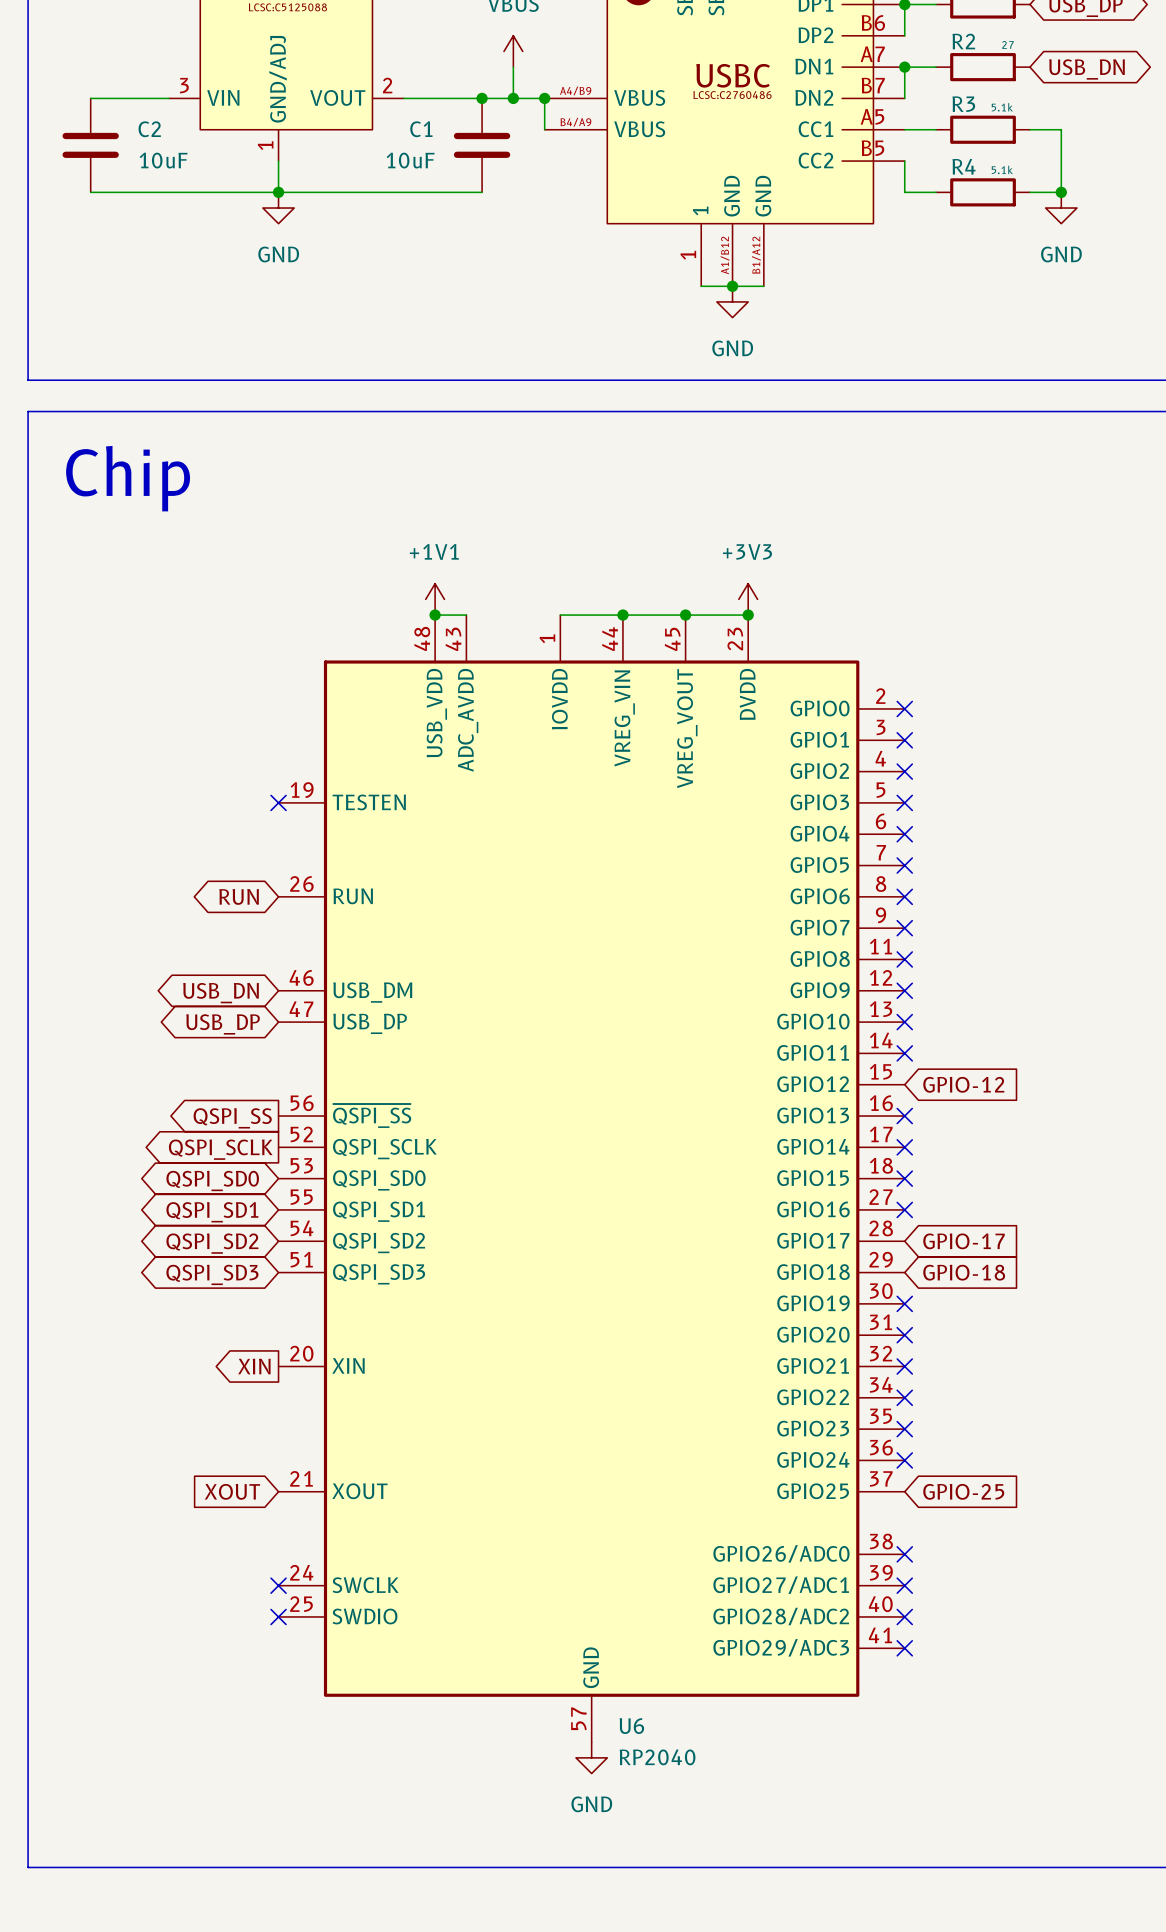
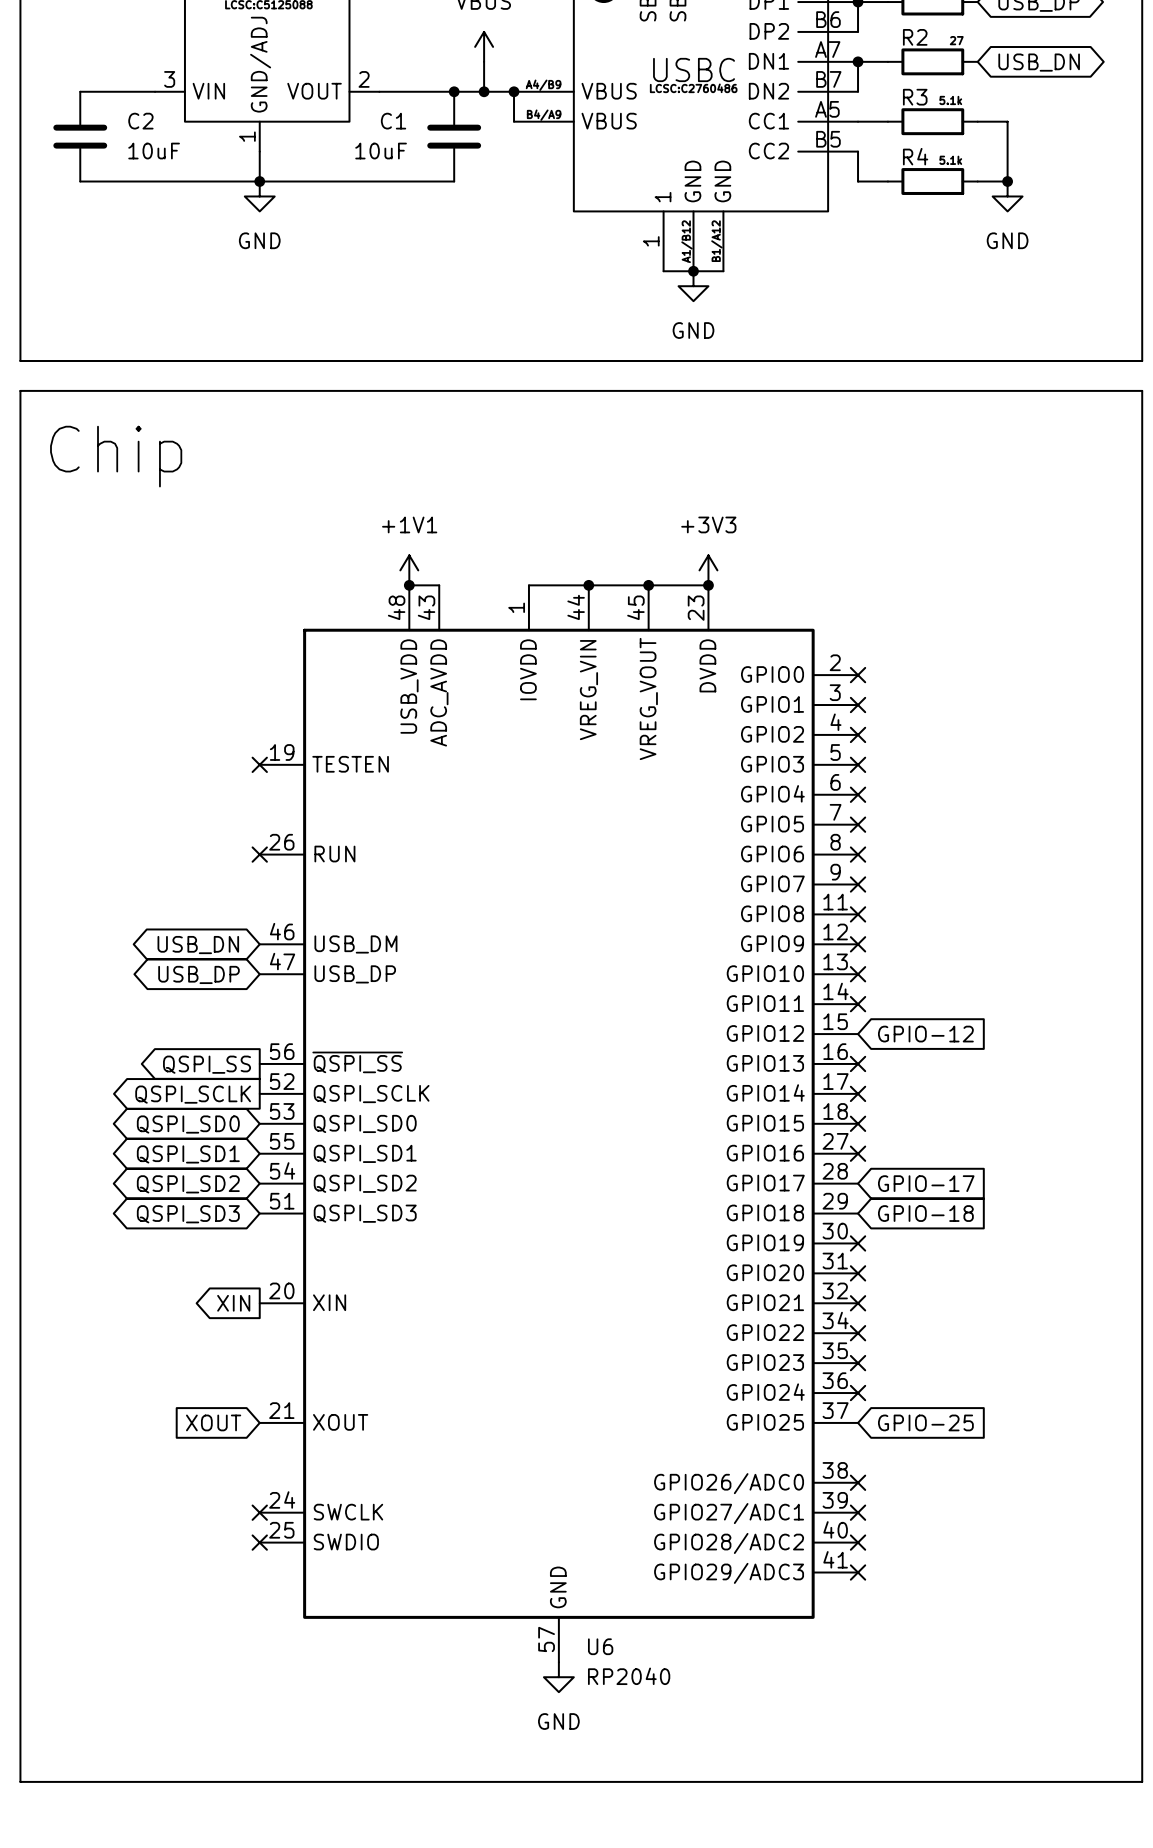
global label: RUN (239, 896) -> none
no-connect mark: none -> (259, 854)

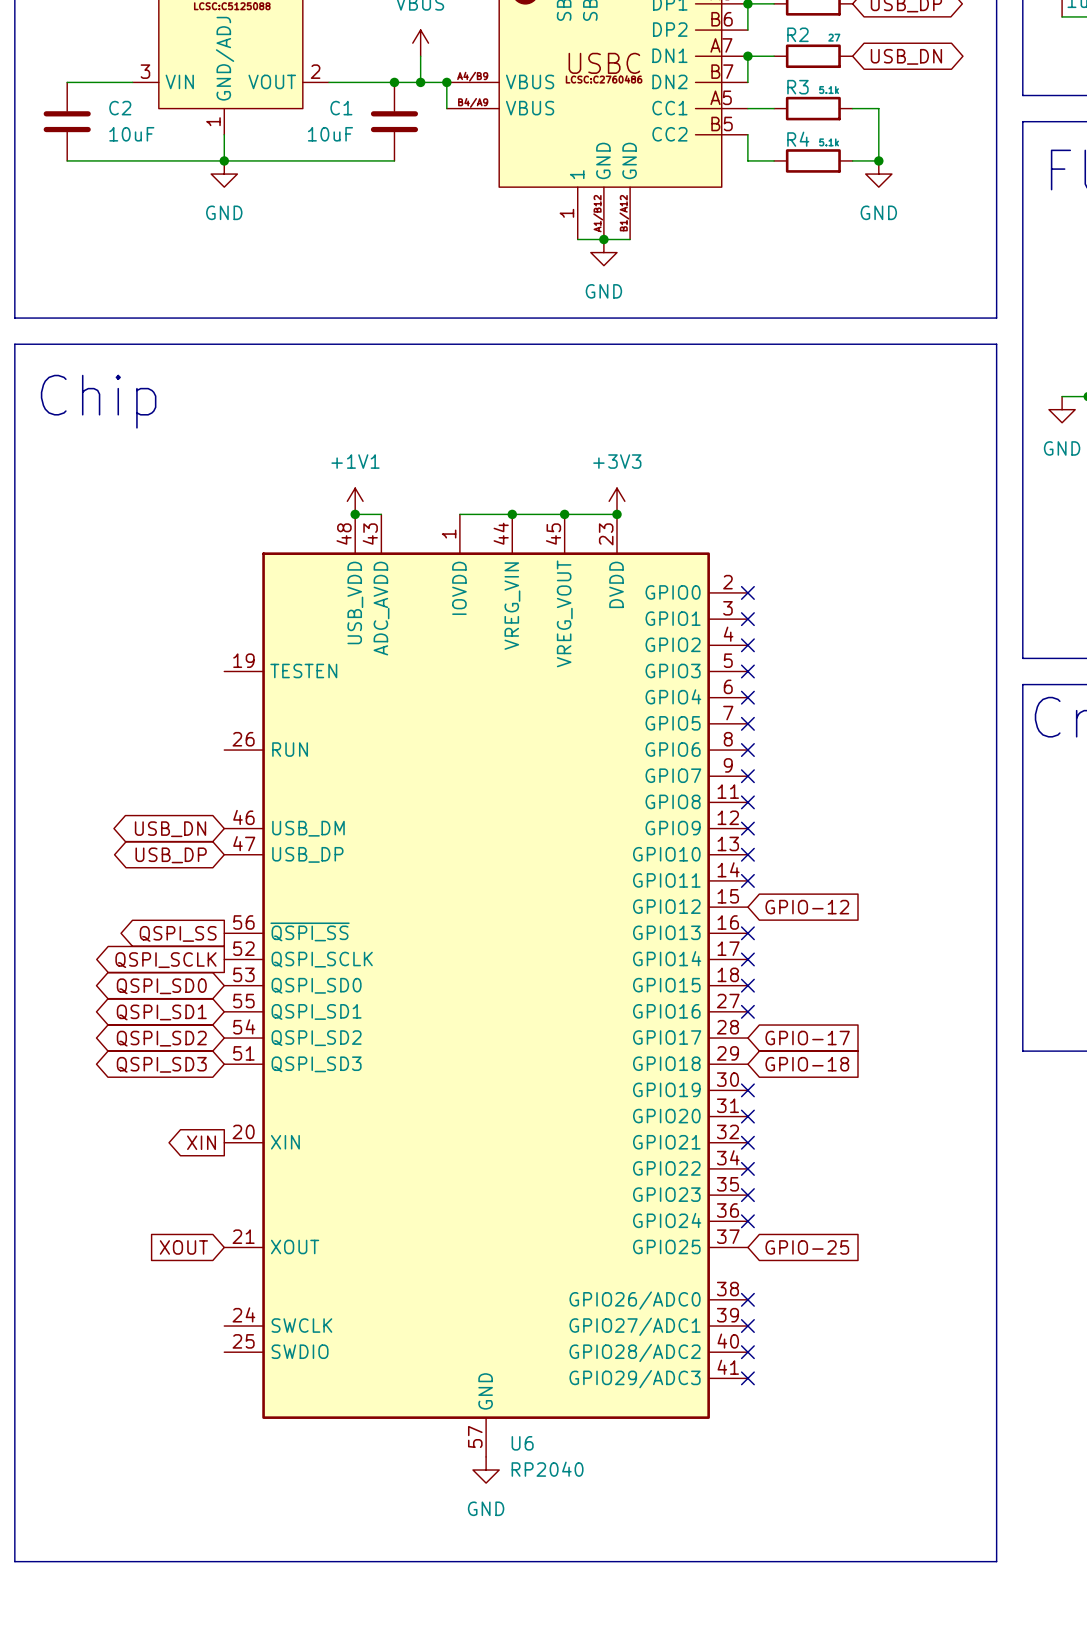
no-connect mark: (259, 764) -> none
no-connect mark: (259, 854) -> none
no-connect mark: (259, 1512) -> none
no-connect mark: (259, 1542) -> none

